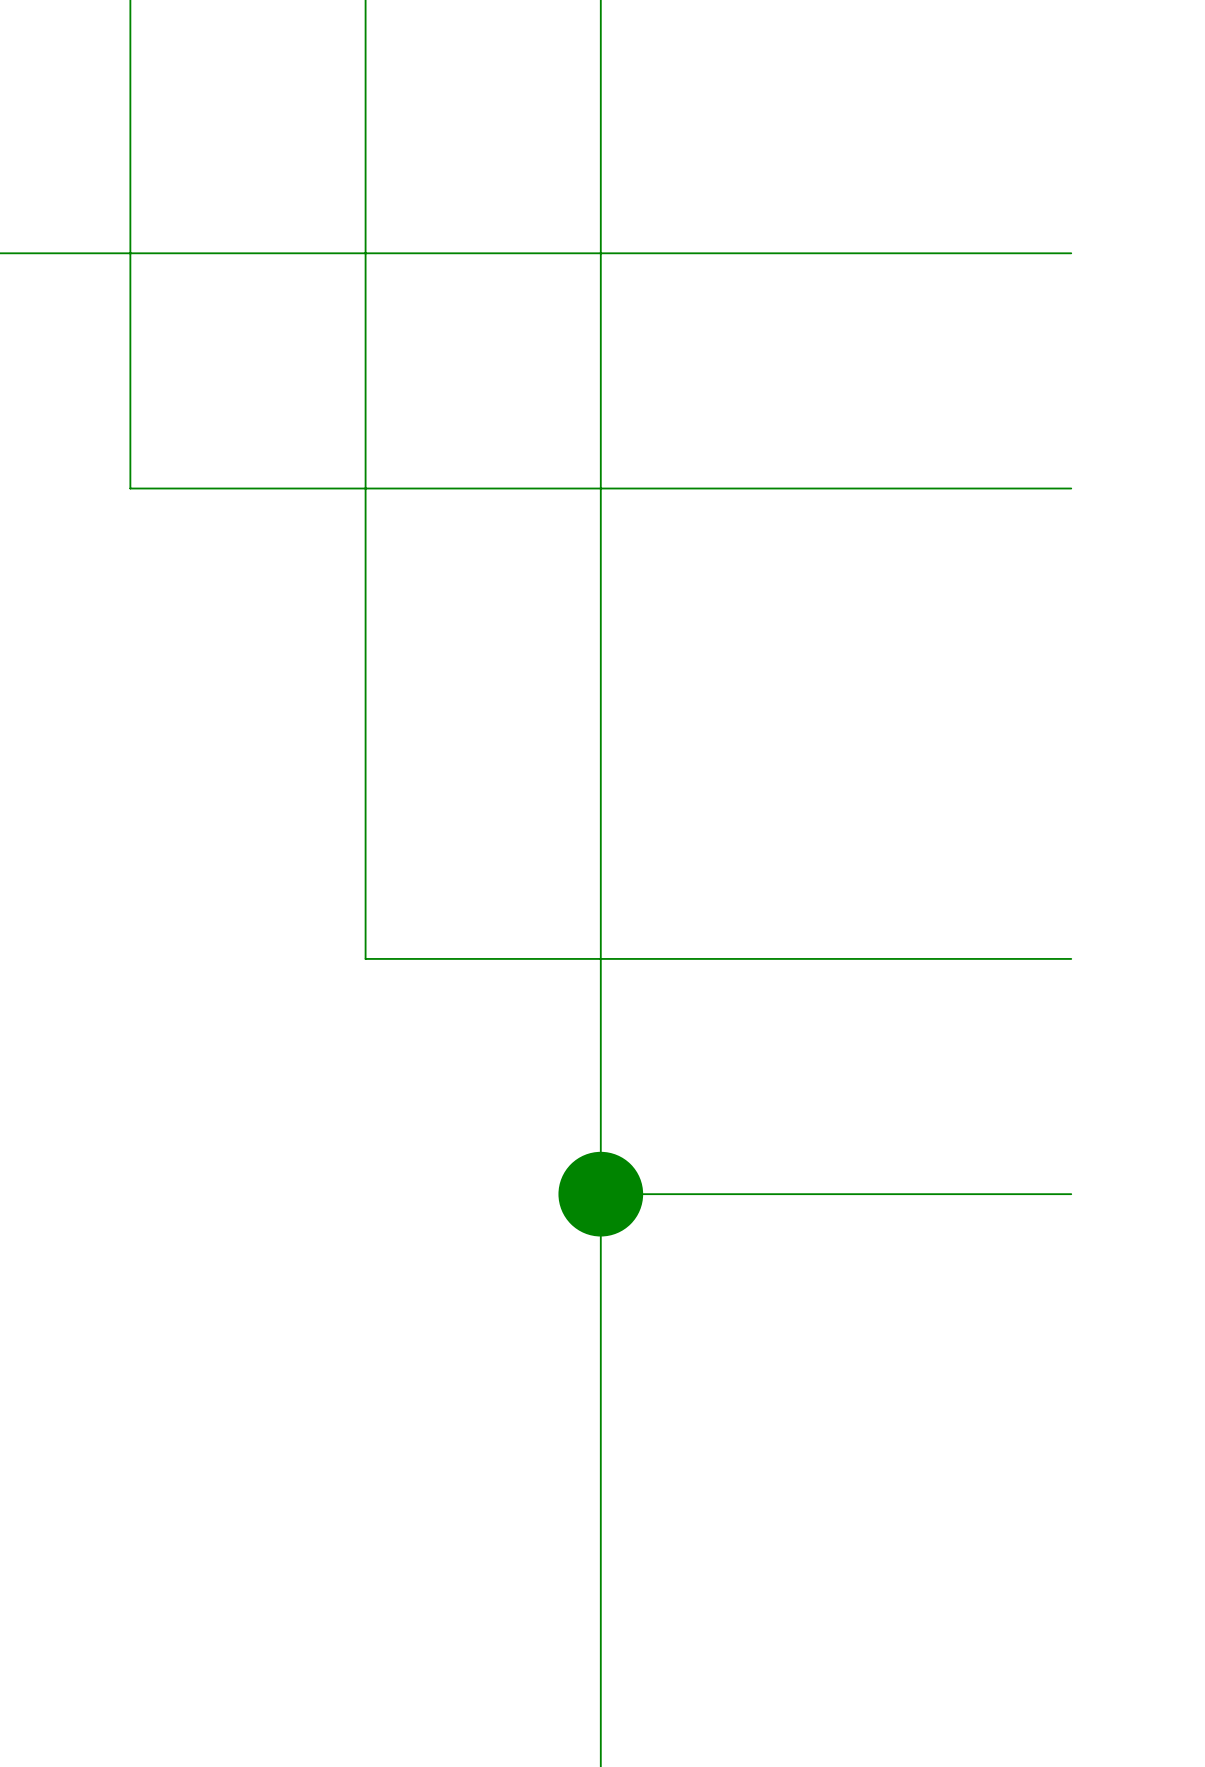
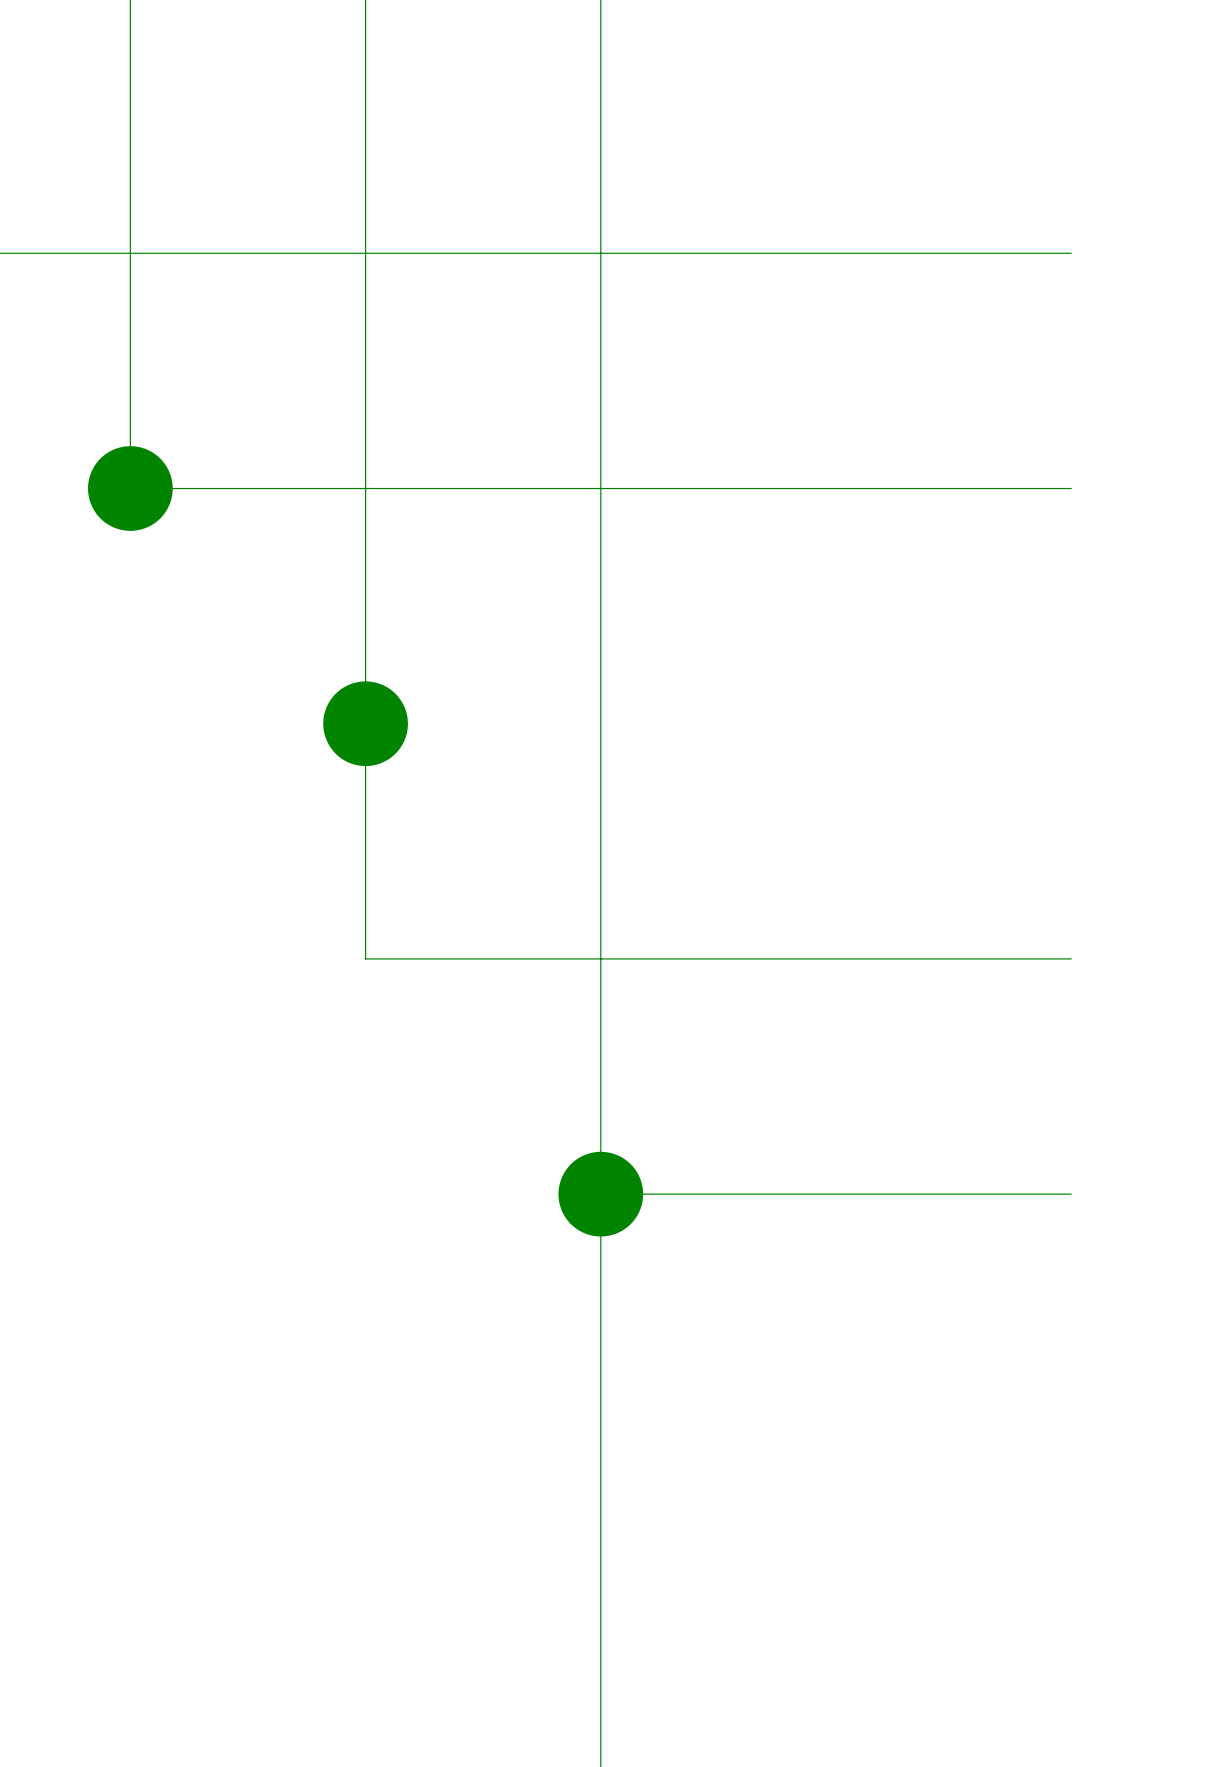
junction: none -> (130, 488)
junction: none -> (365, 723)

